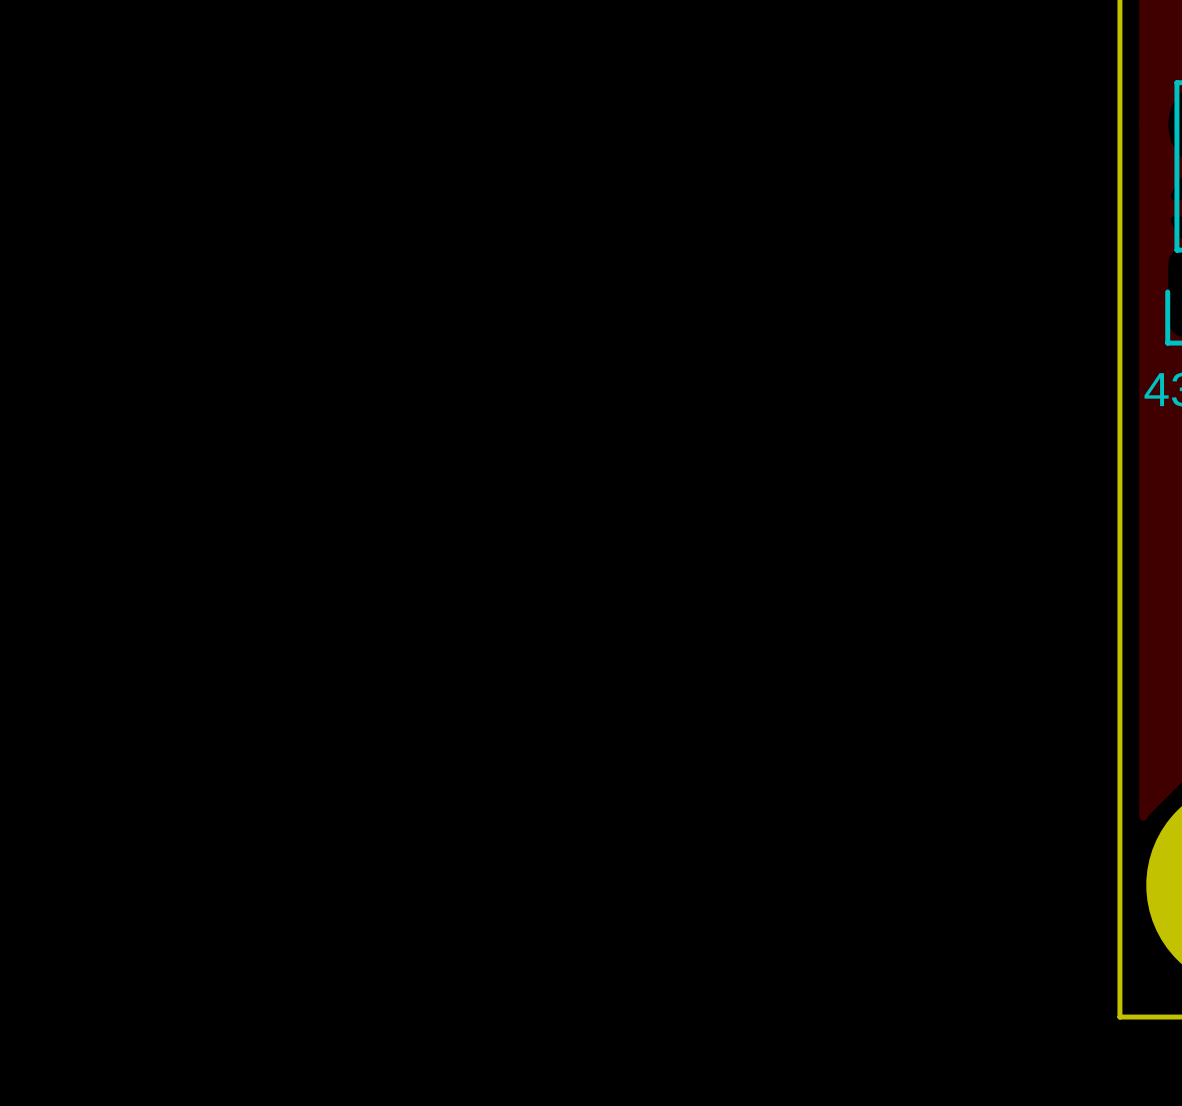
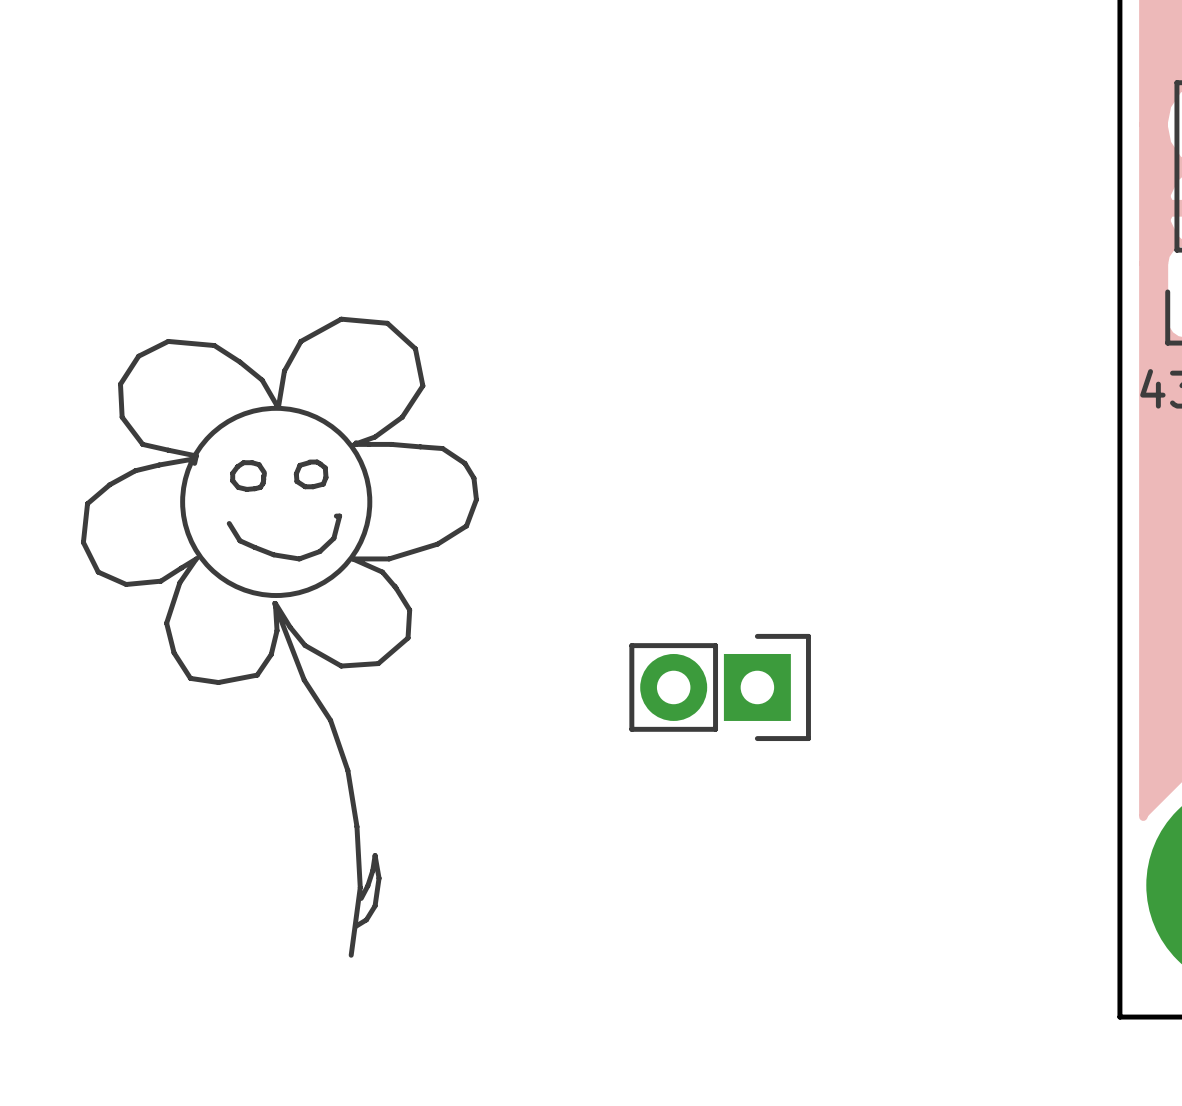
drawing: none -> [80, 316, 479, 958]
part: none -> (720, 687)

